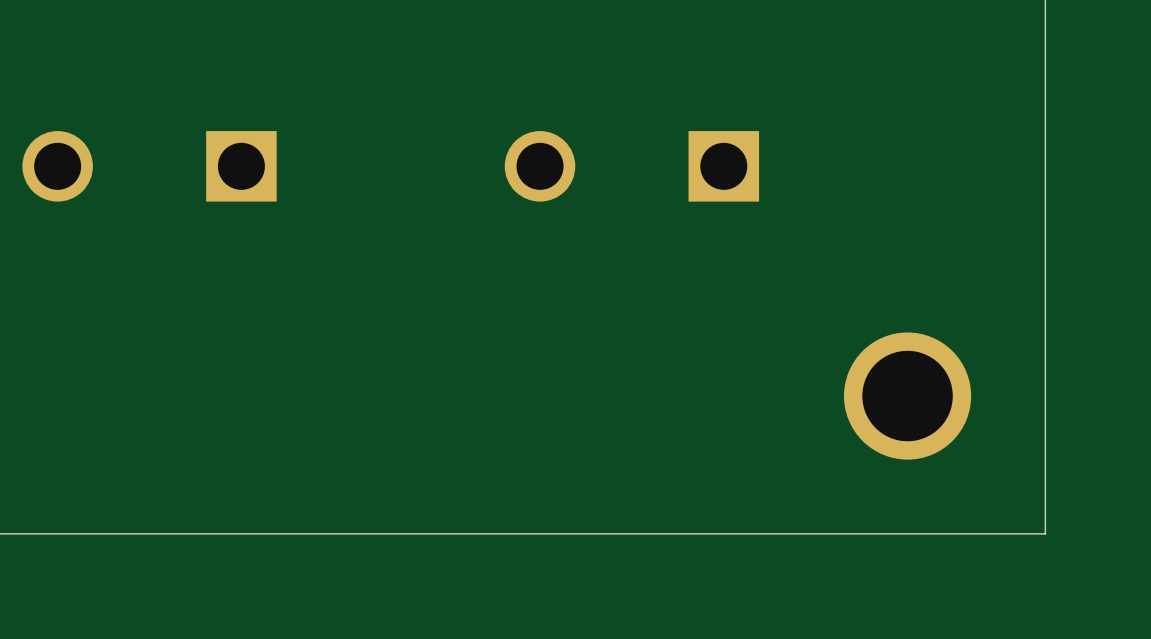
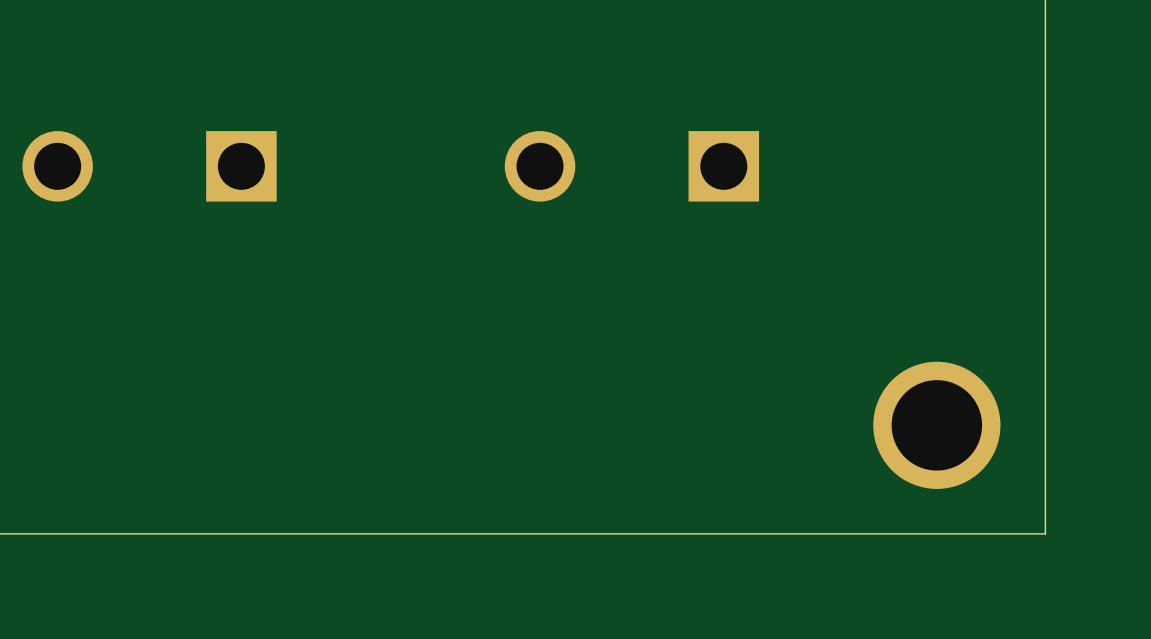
part position: (907, 396) -> (936, 425)

